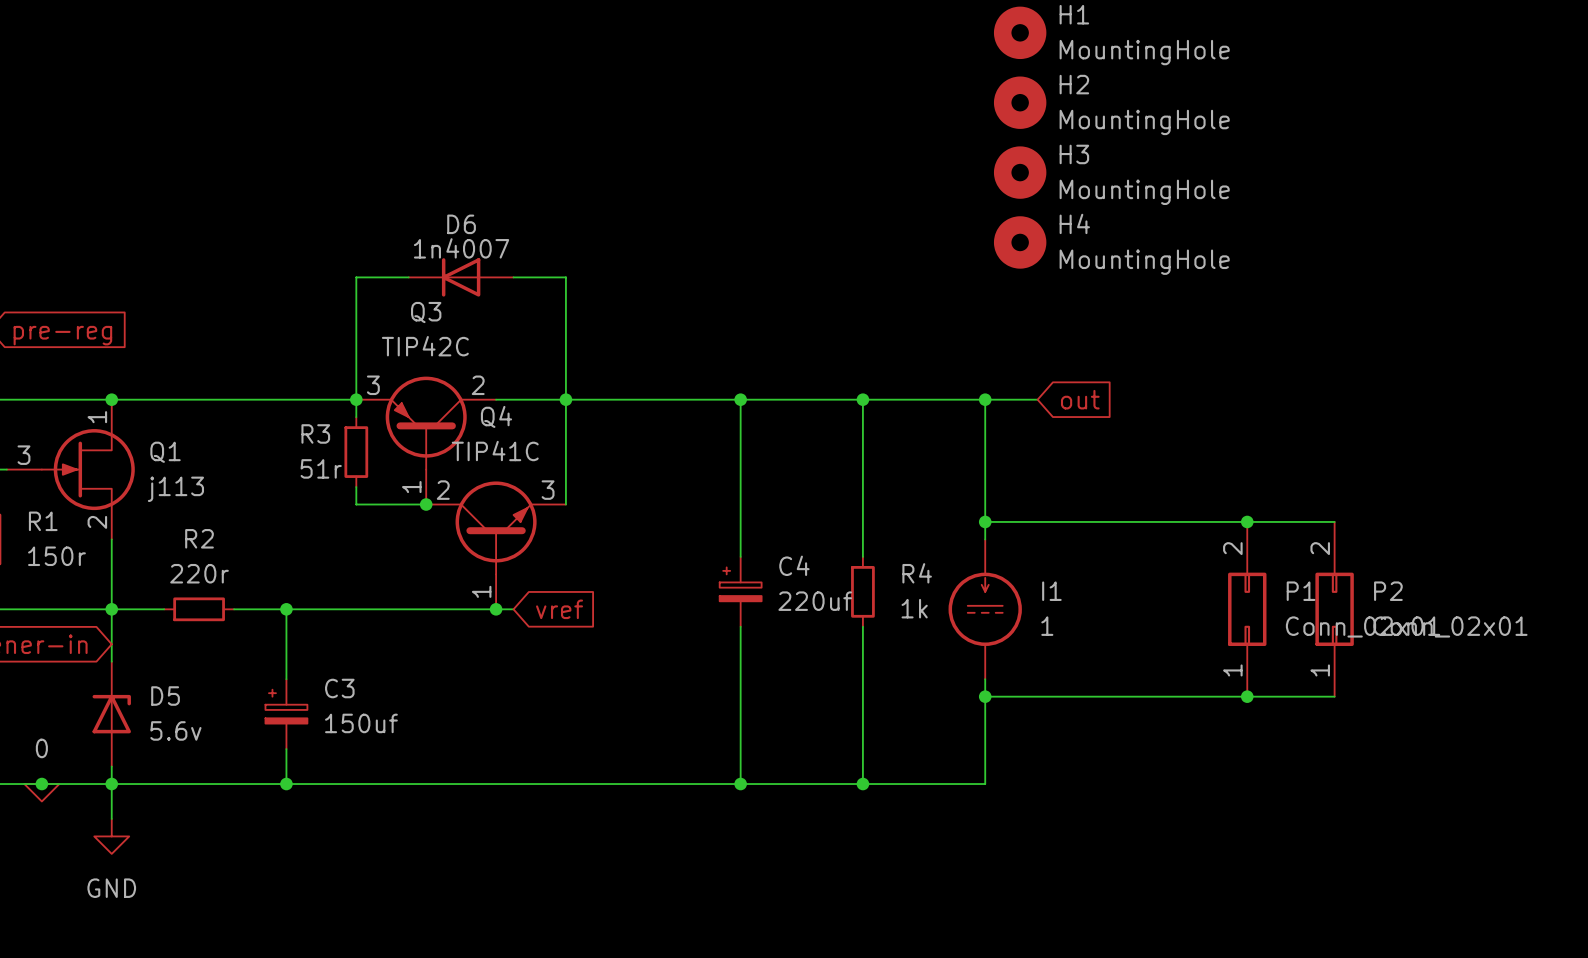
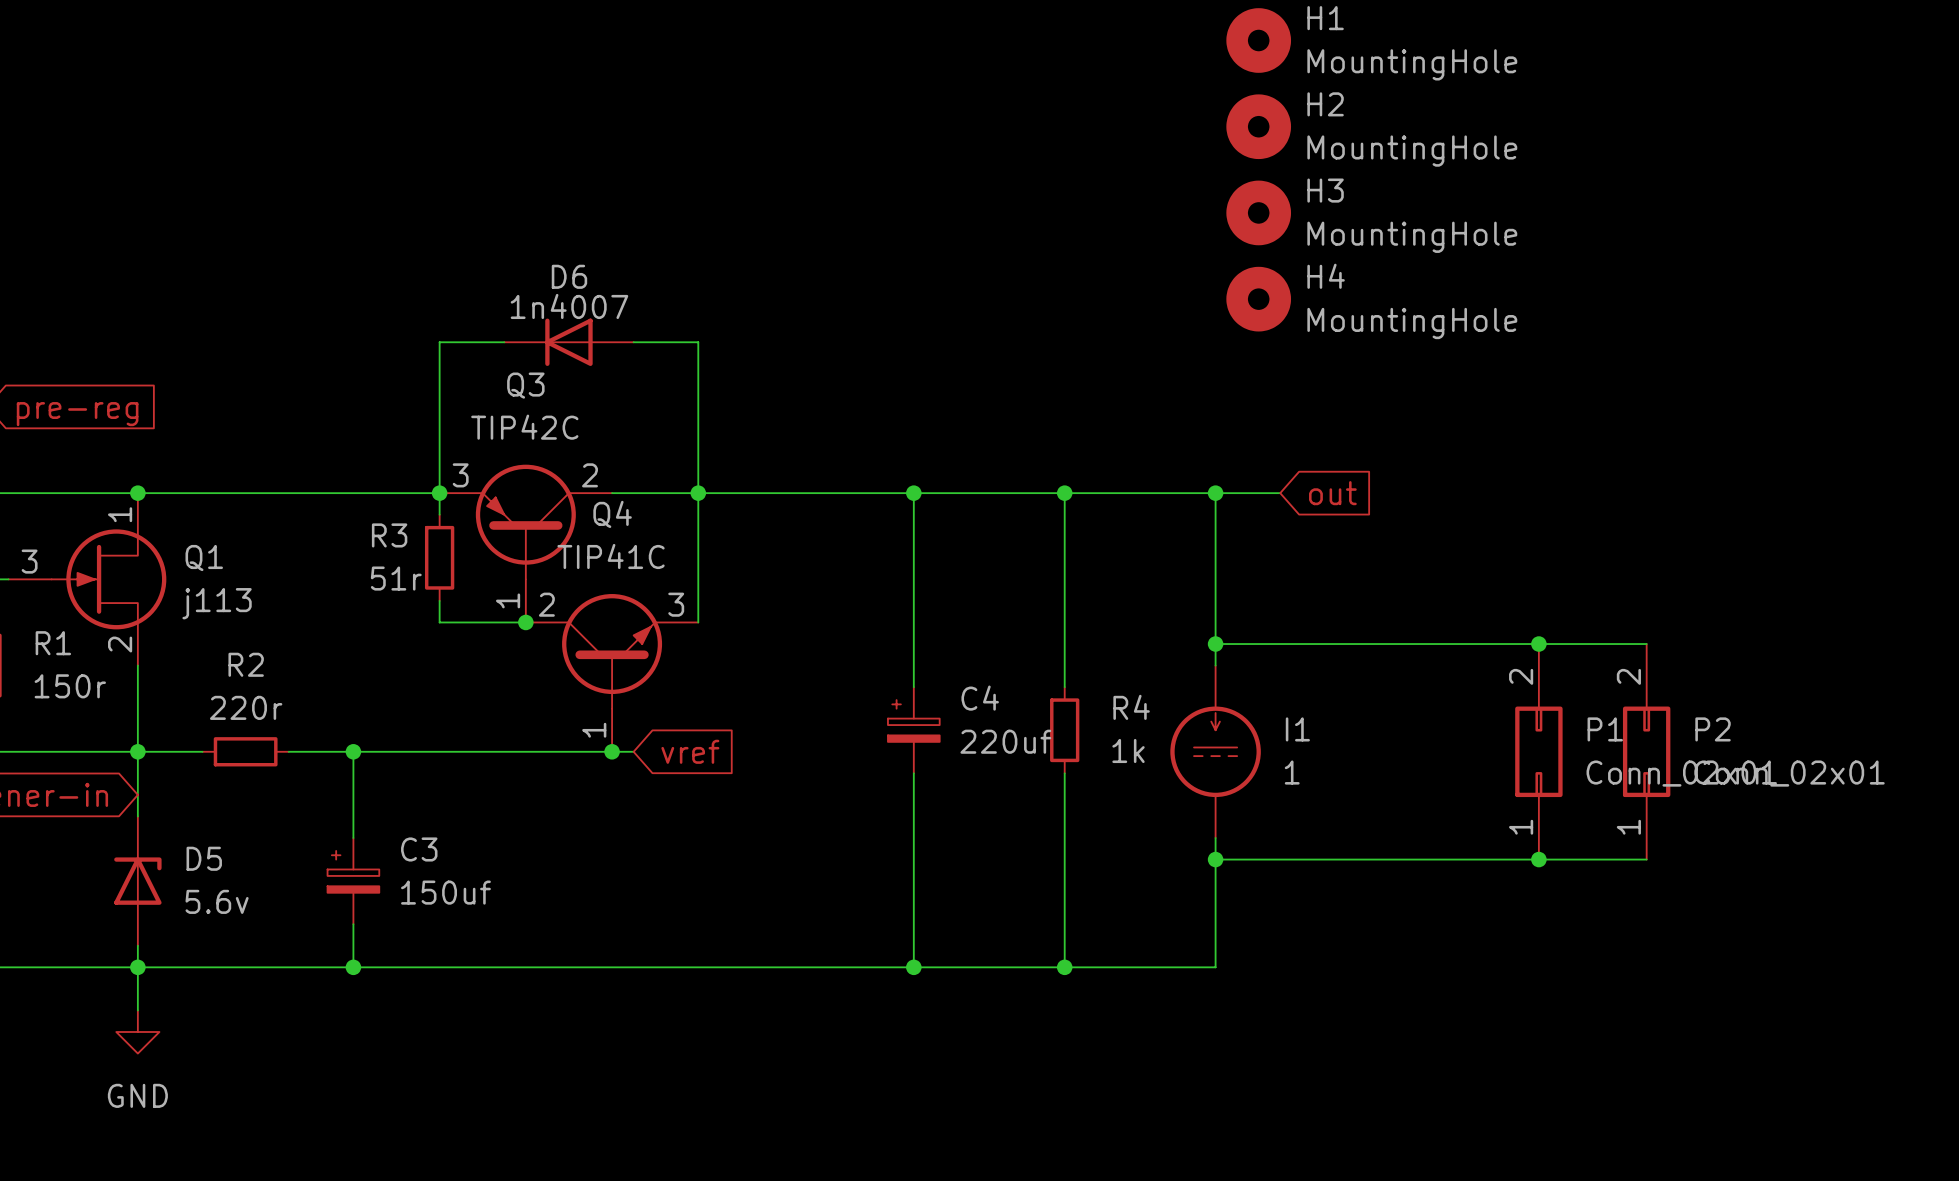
junction: (41, 784) -> none
power symbol: 0 (41, 792) -> none

